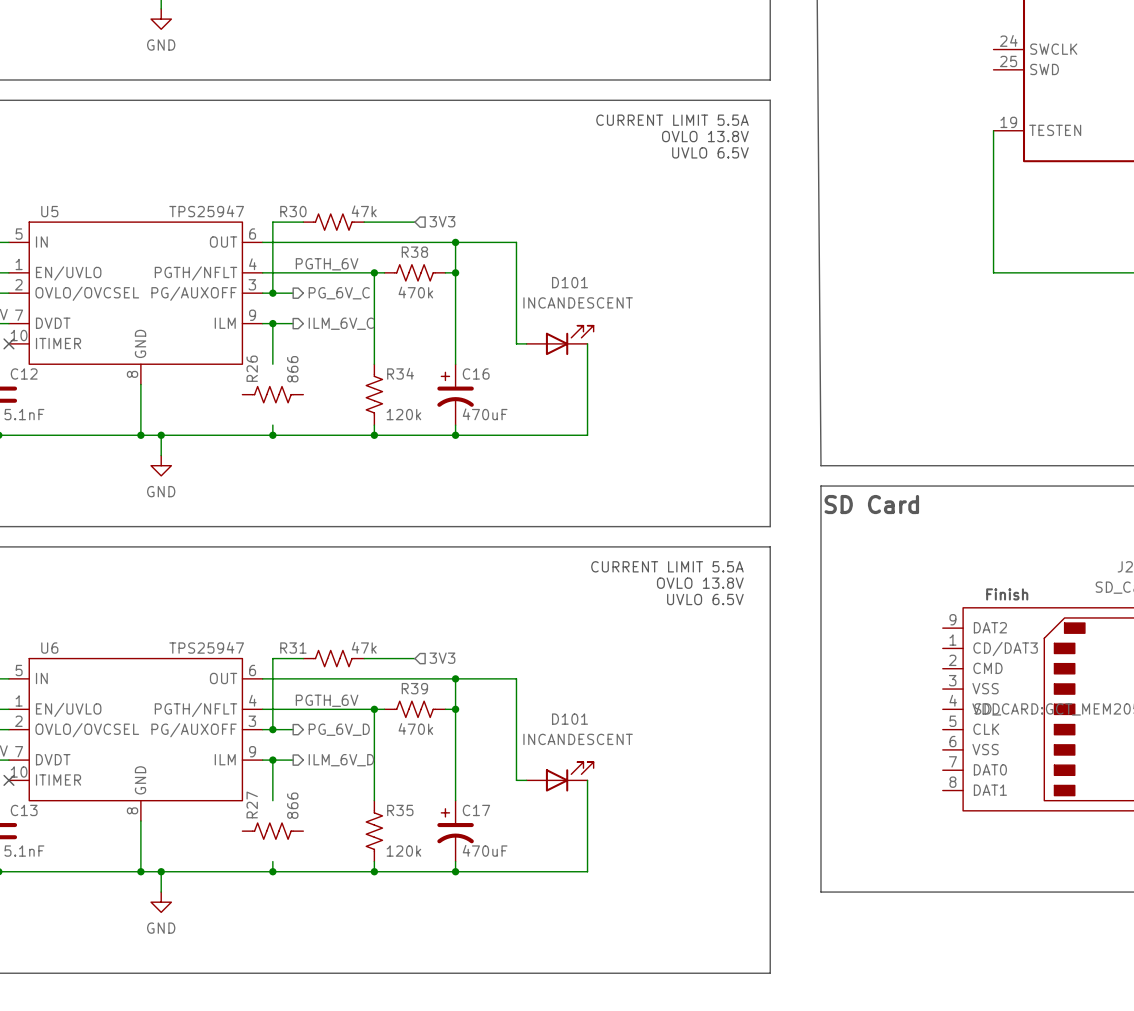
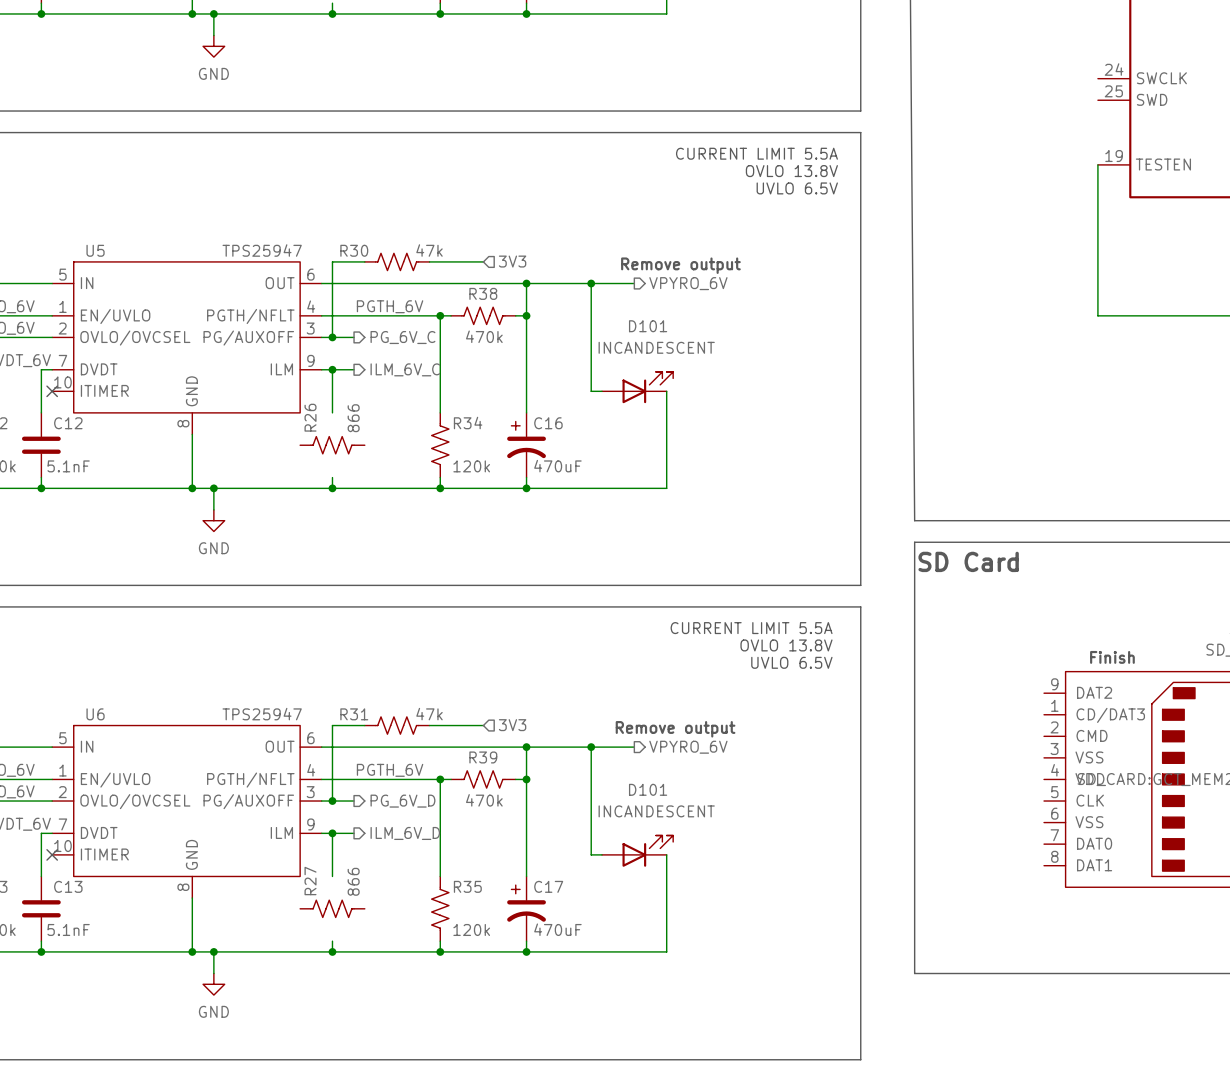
text: none -> Remove output (680, 265)
wire: none -> (591, 283) (634, 283)
junction: none -> (591, 283)
hierarchical label: none -> VPYRO_6V (688, 283)
text: none -> Remove output (675, 729)
wire: none -> (591, 747) (634, 747)
junction: none -> (591, 747)
hierarchical label: none -> VPYRO_6V (688, 747)

